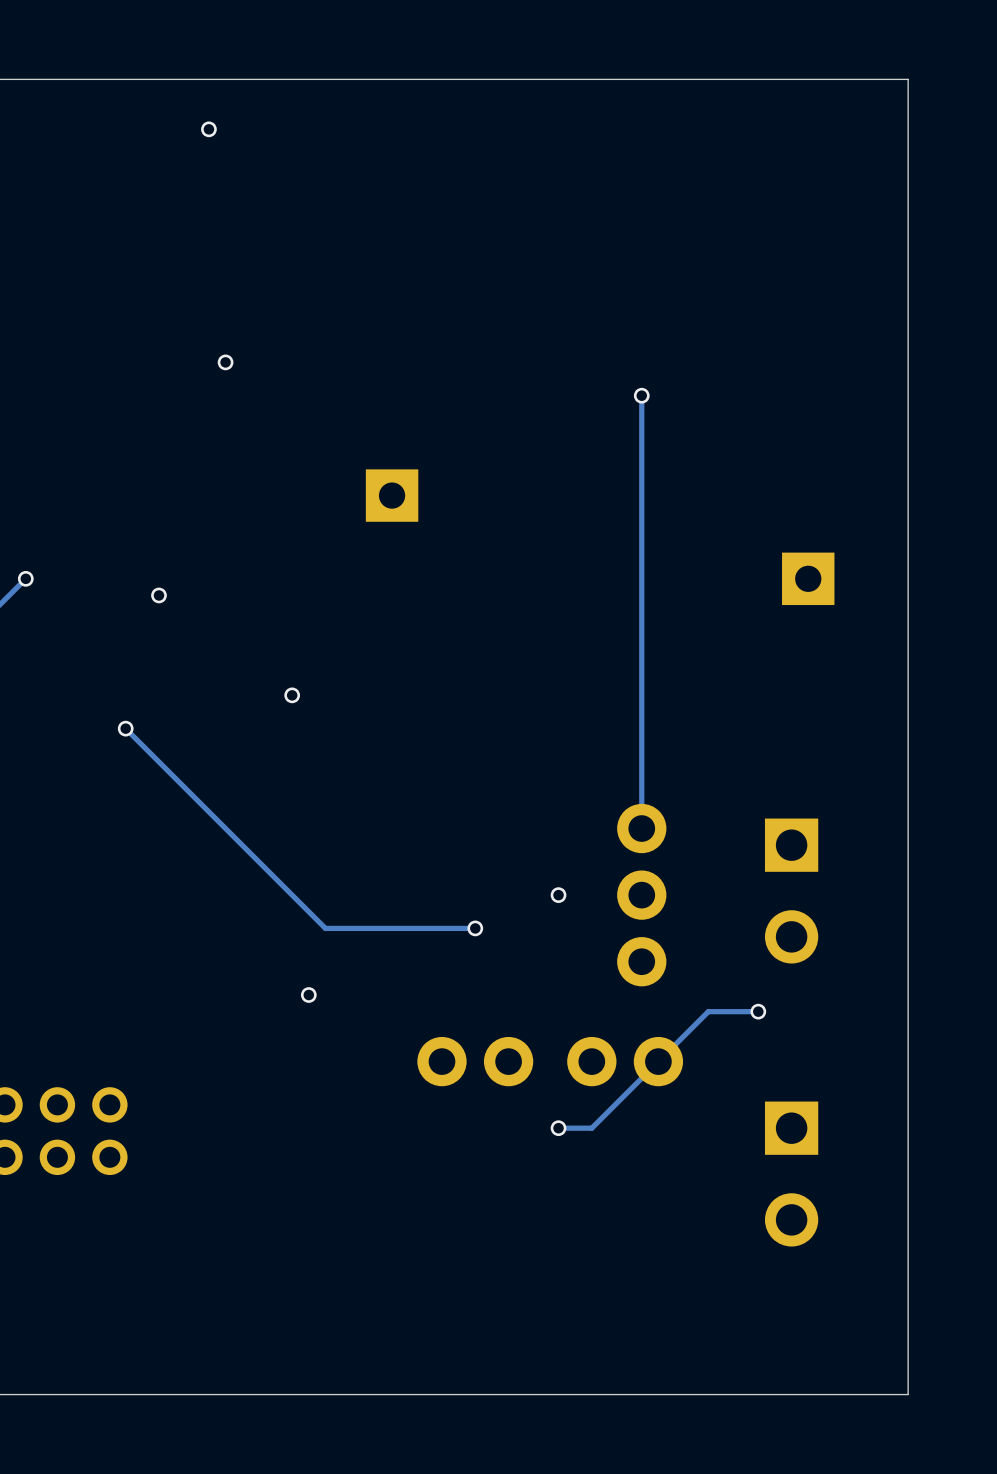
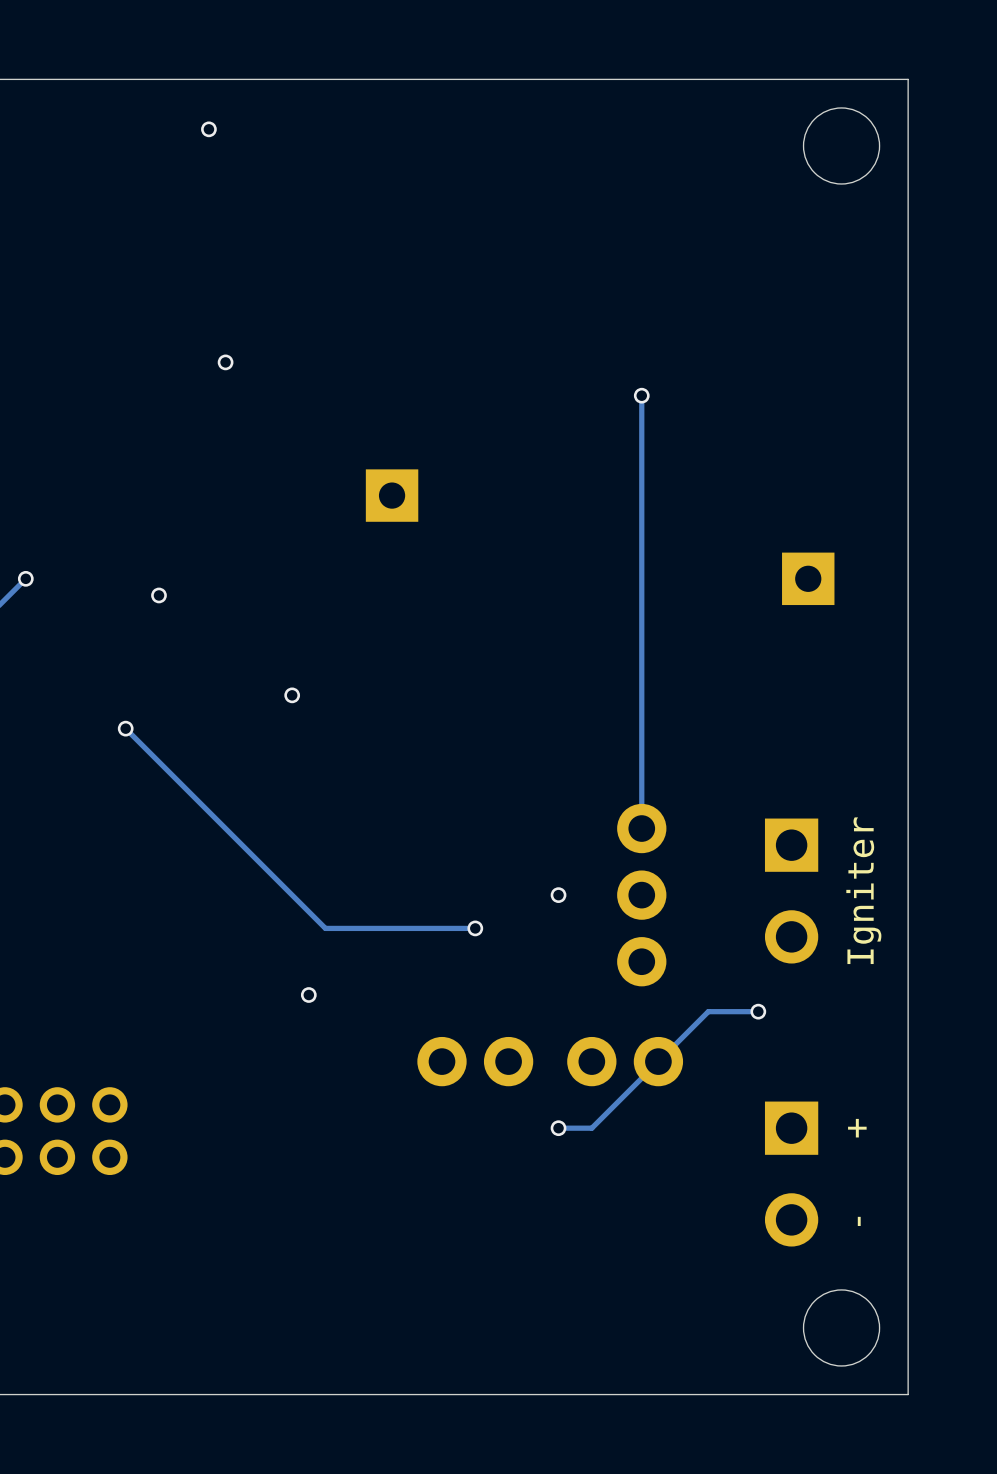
round board edge: none -> [802, 107, 881, 185]
text: none -> Igniter (863, 890)
text: none -> + (857, 1128)
text: none -> - (859, 1221)
round board edge: none -> [802, 1289, 881, 1367]

